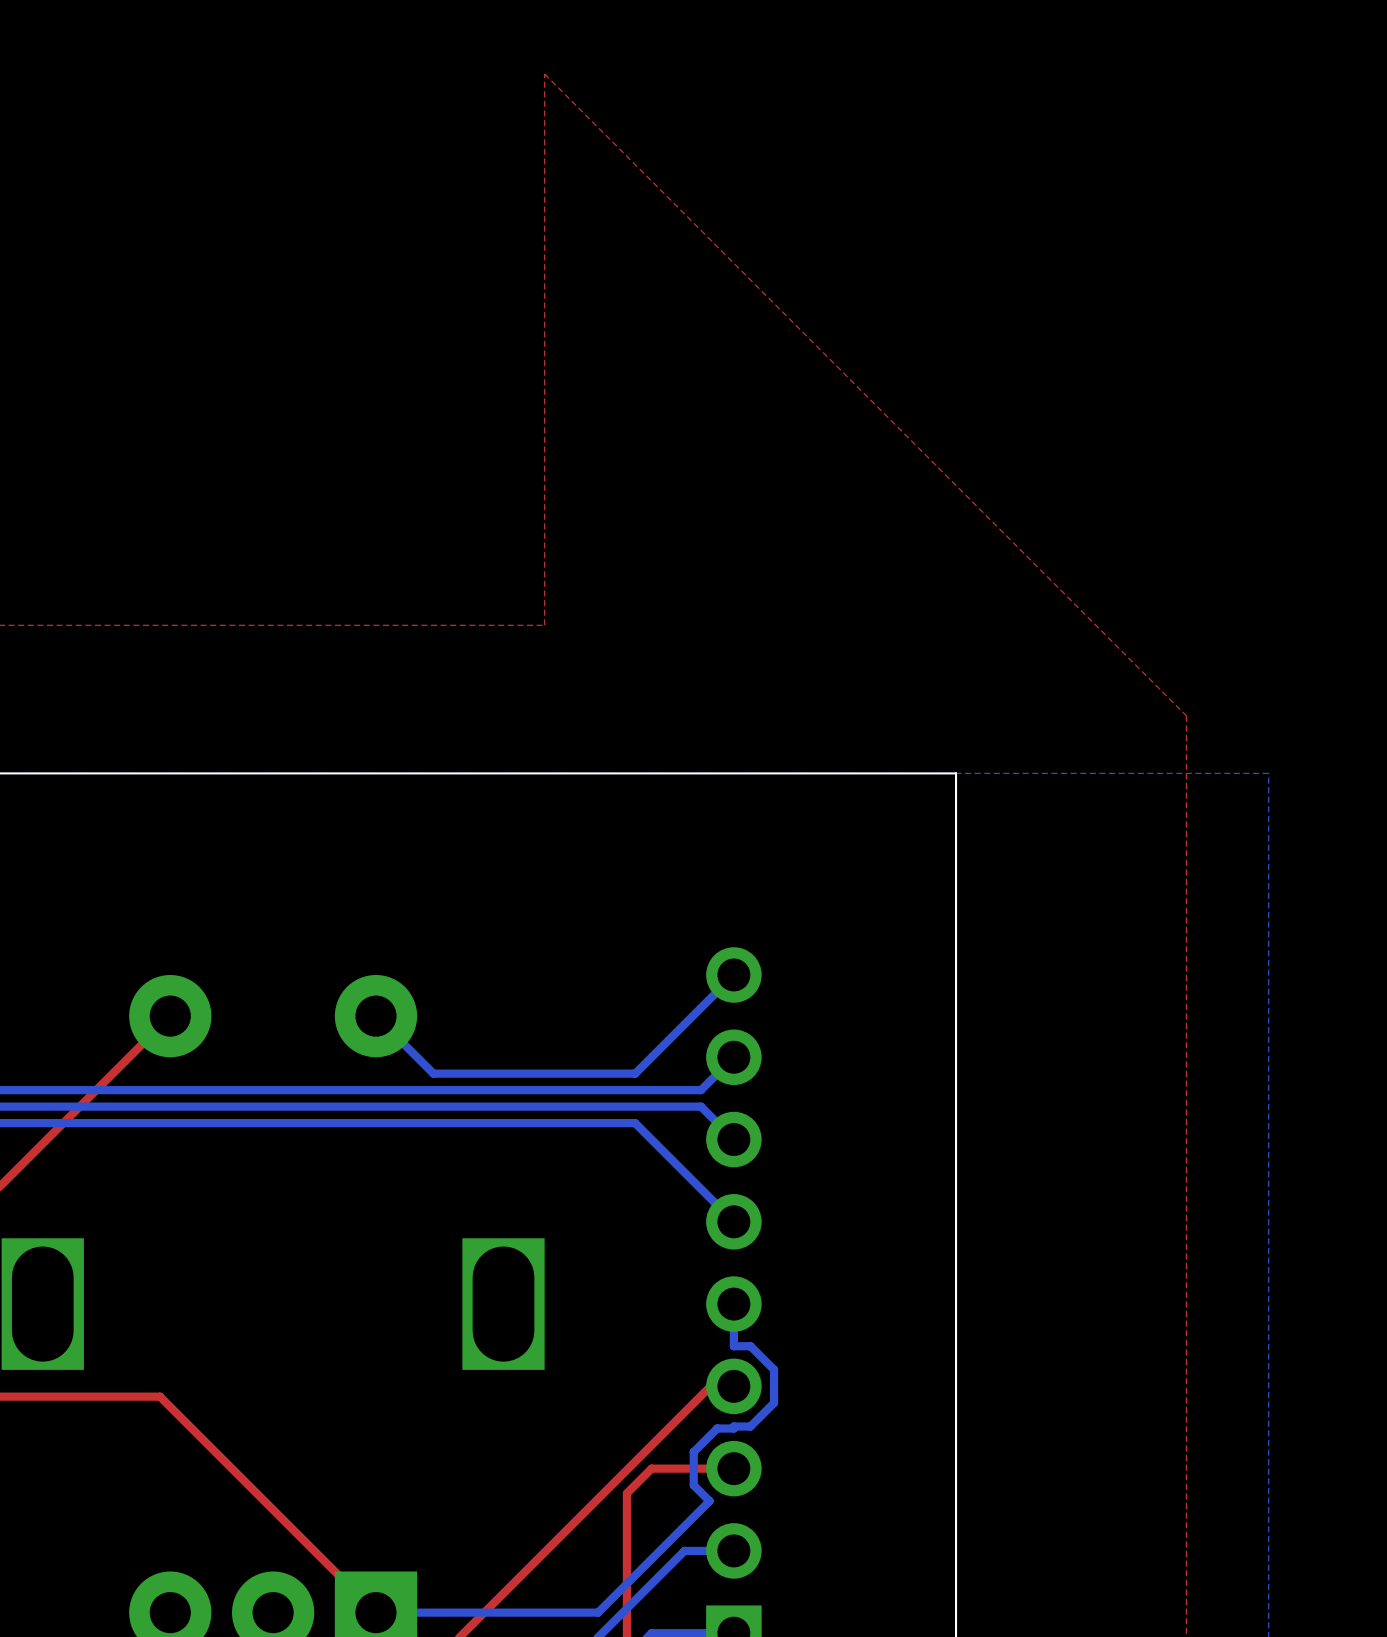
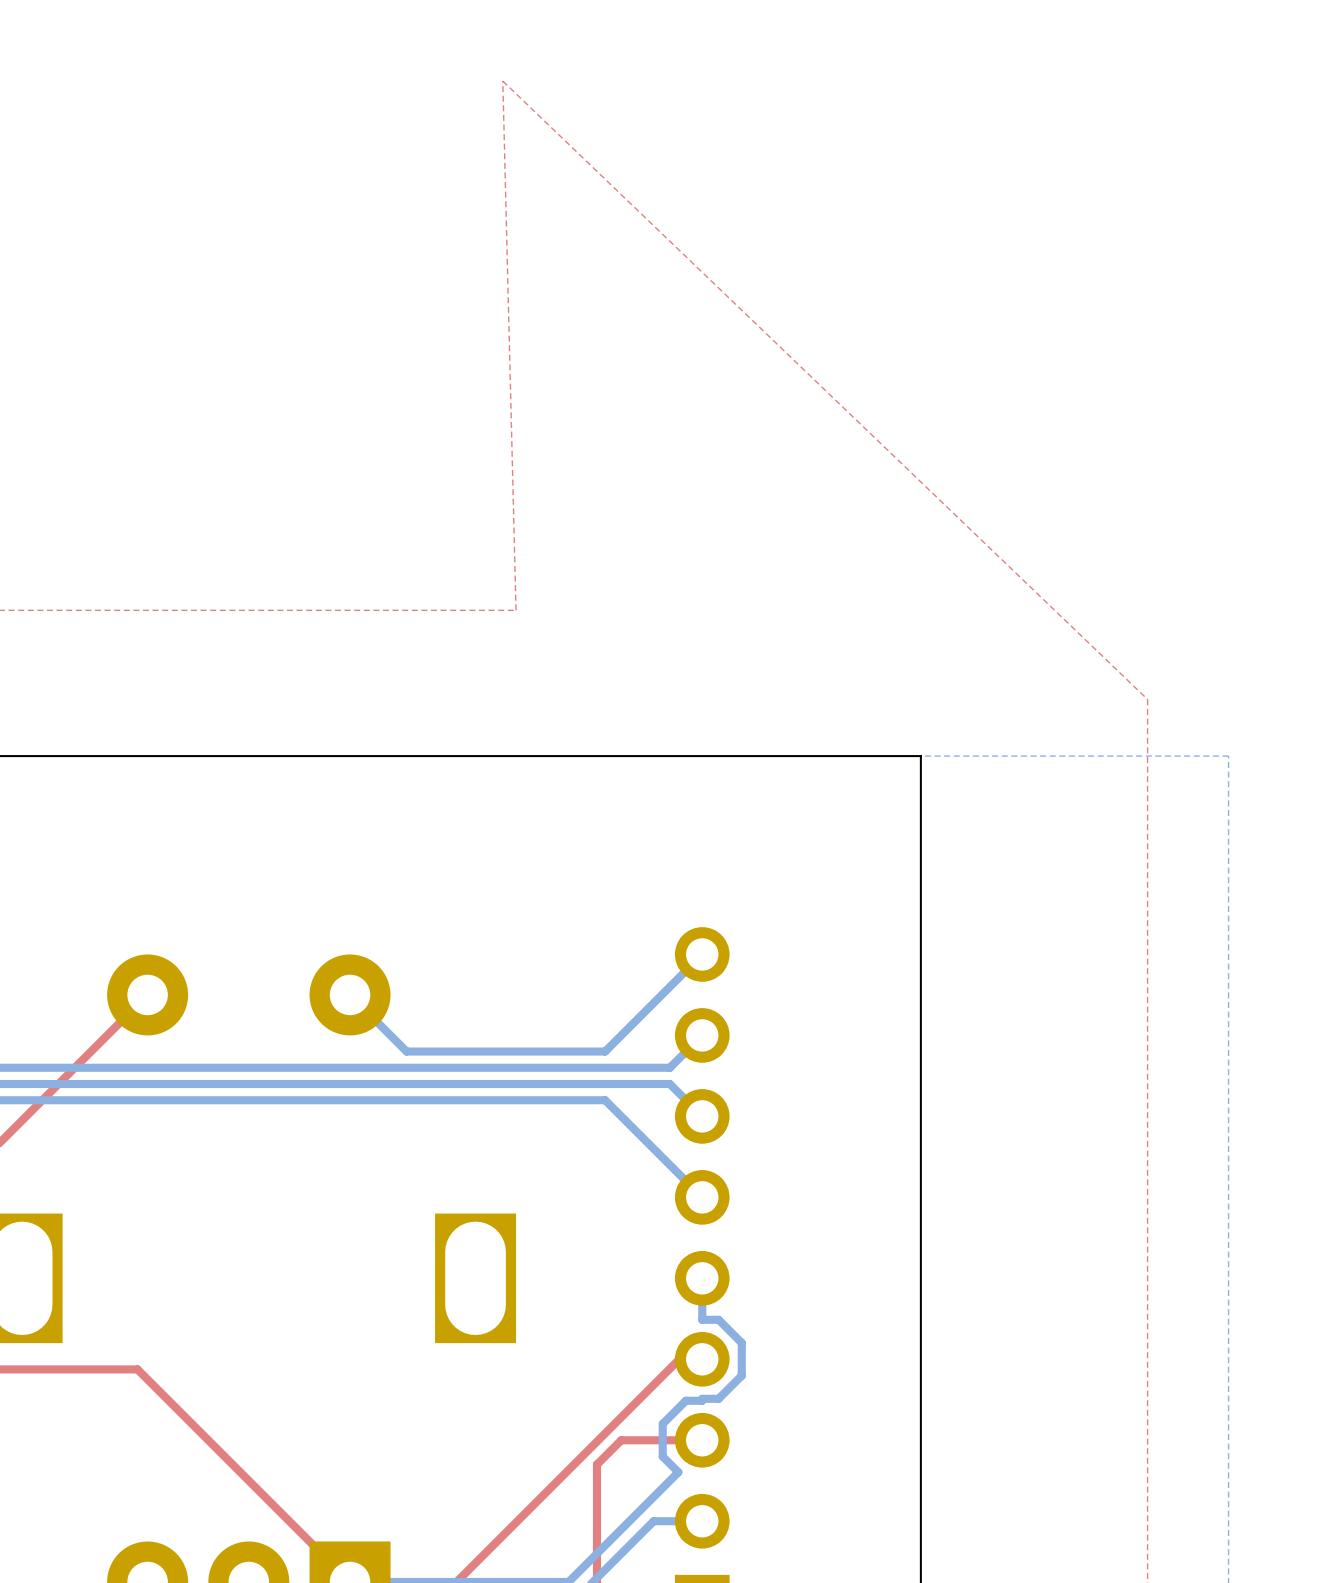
top zone outline: (544, 625) (544, 74) (1186, 715) -> (516, 610) (502, 81) (1147, 699)

